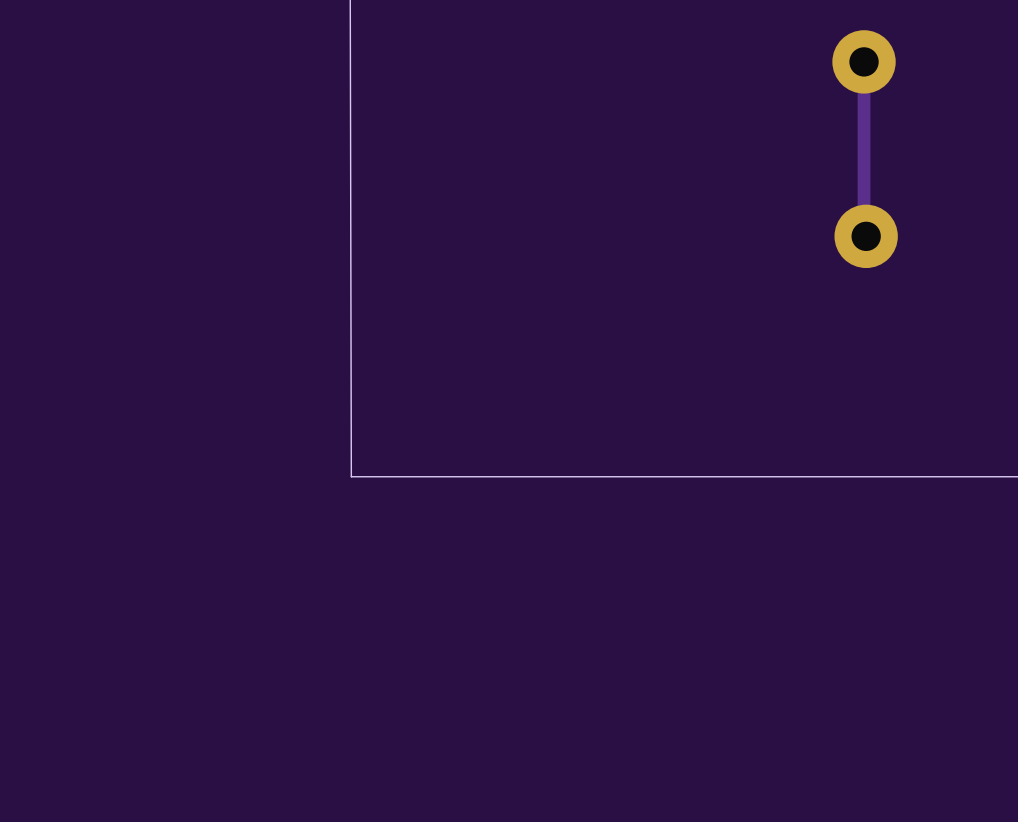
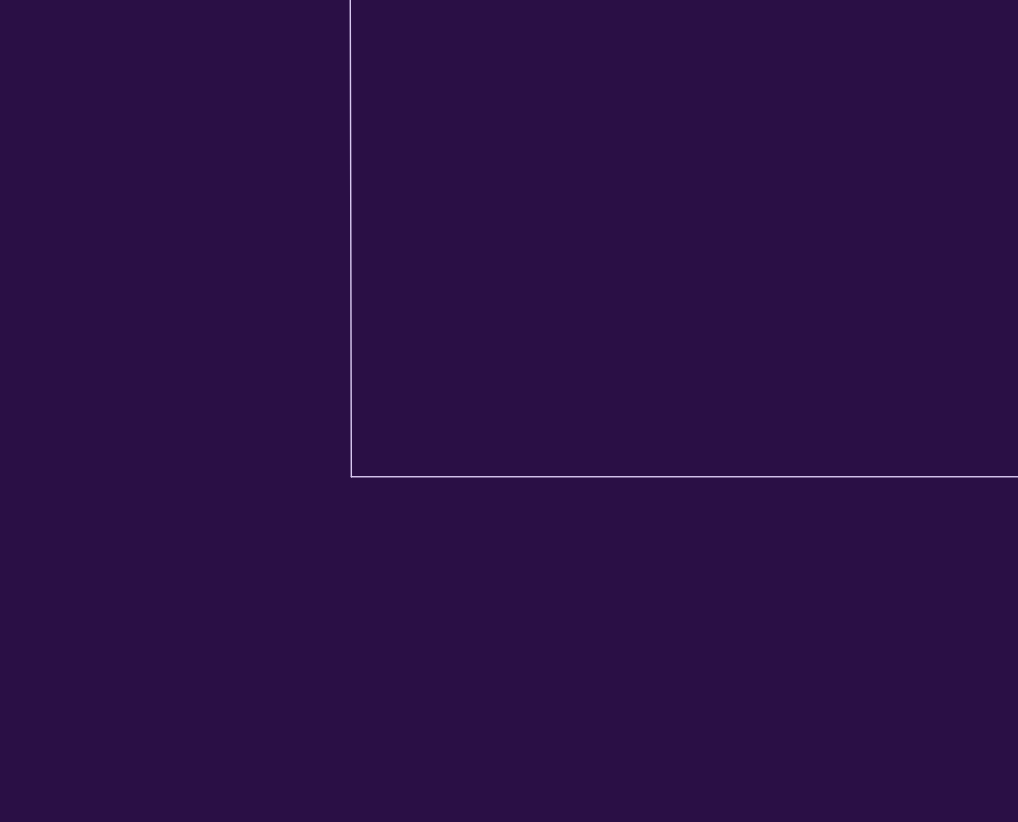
track: (864, 61) (864, 234) (866, 236) -> none
via: (864, 61) -> none
via: (866, 236) -> none

